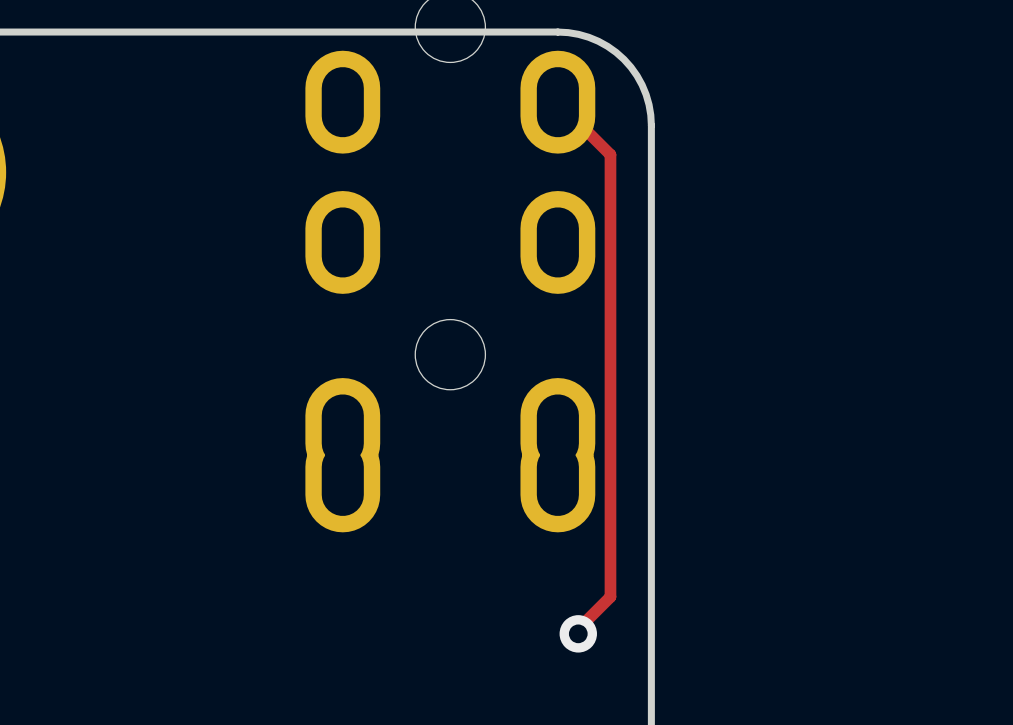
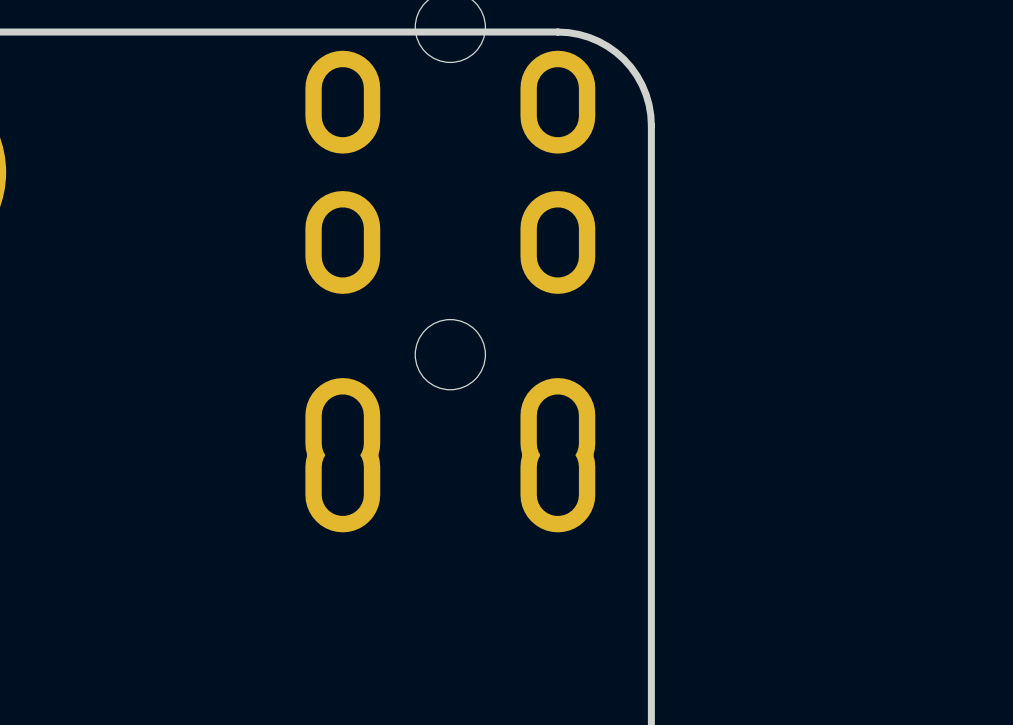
track: (557, 102) (610, 154) (610, 596) (578, 629) (578, 633) (573, 633) (574, 632) -> none
via: (578, 633) -> none

